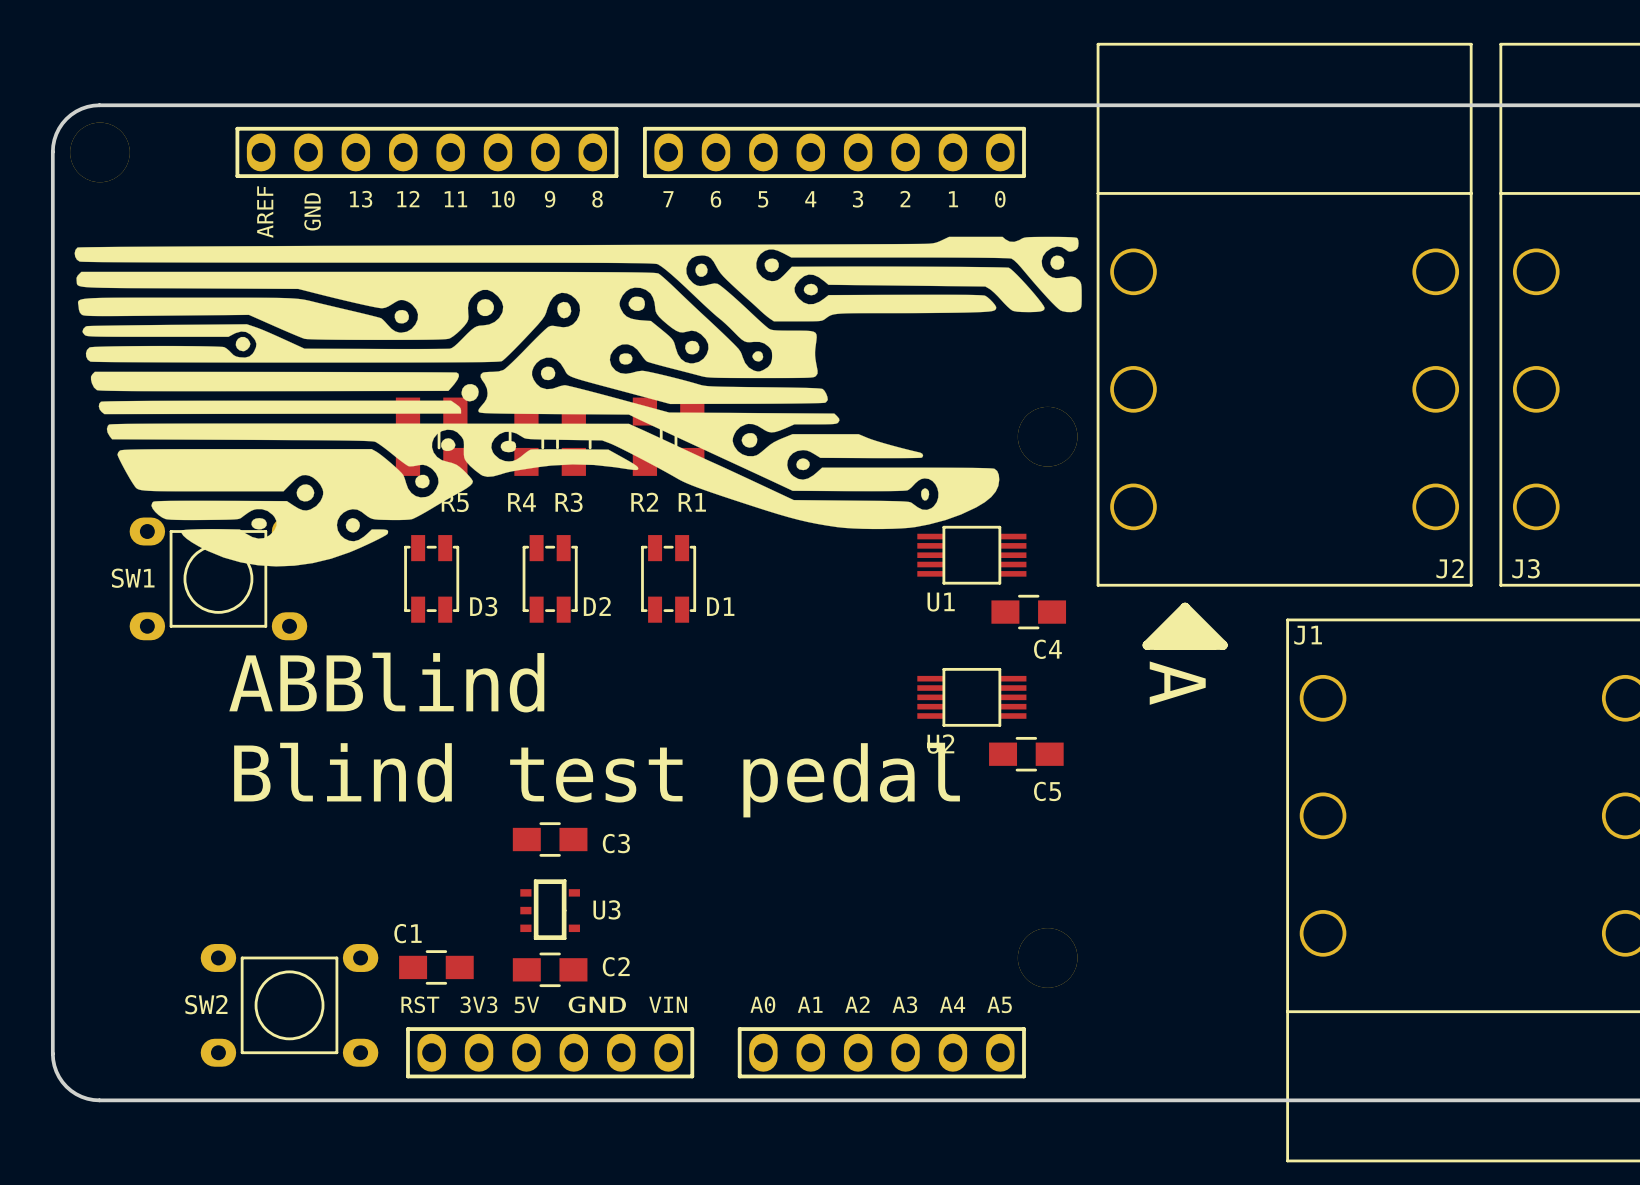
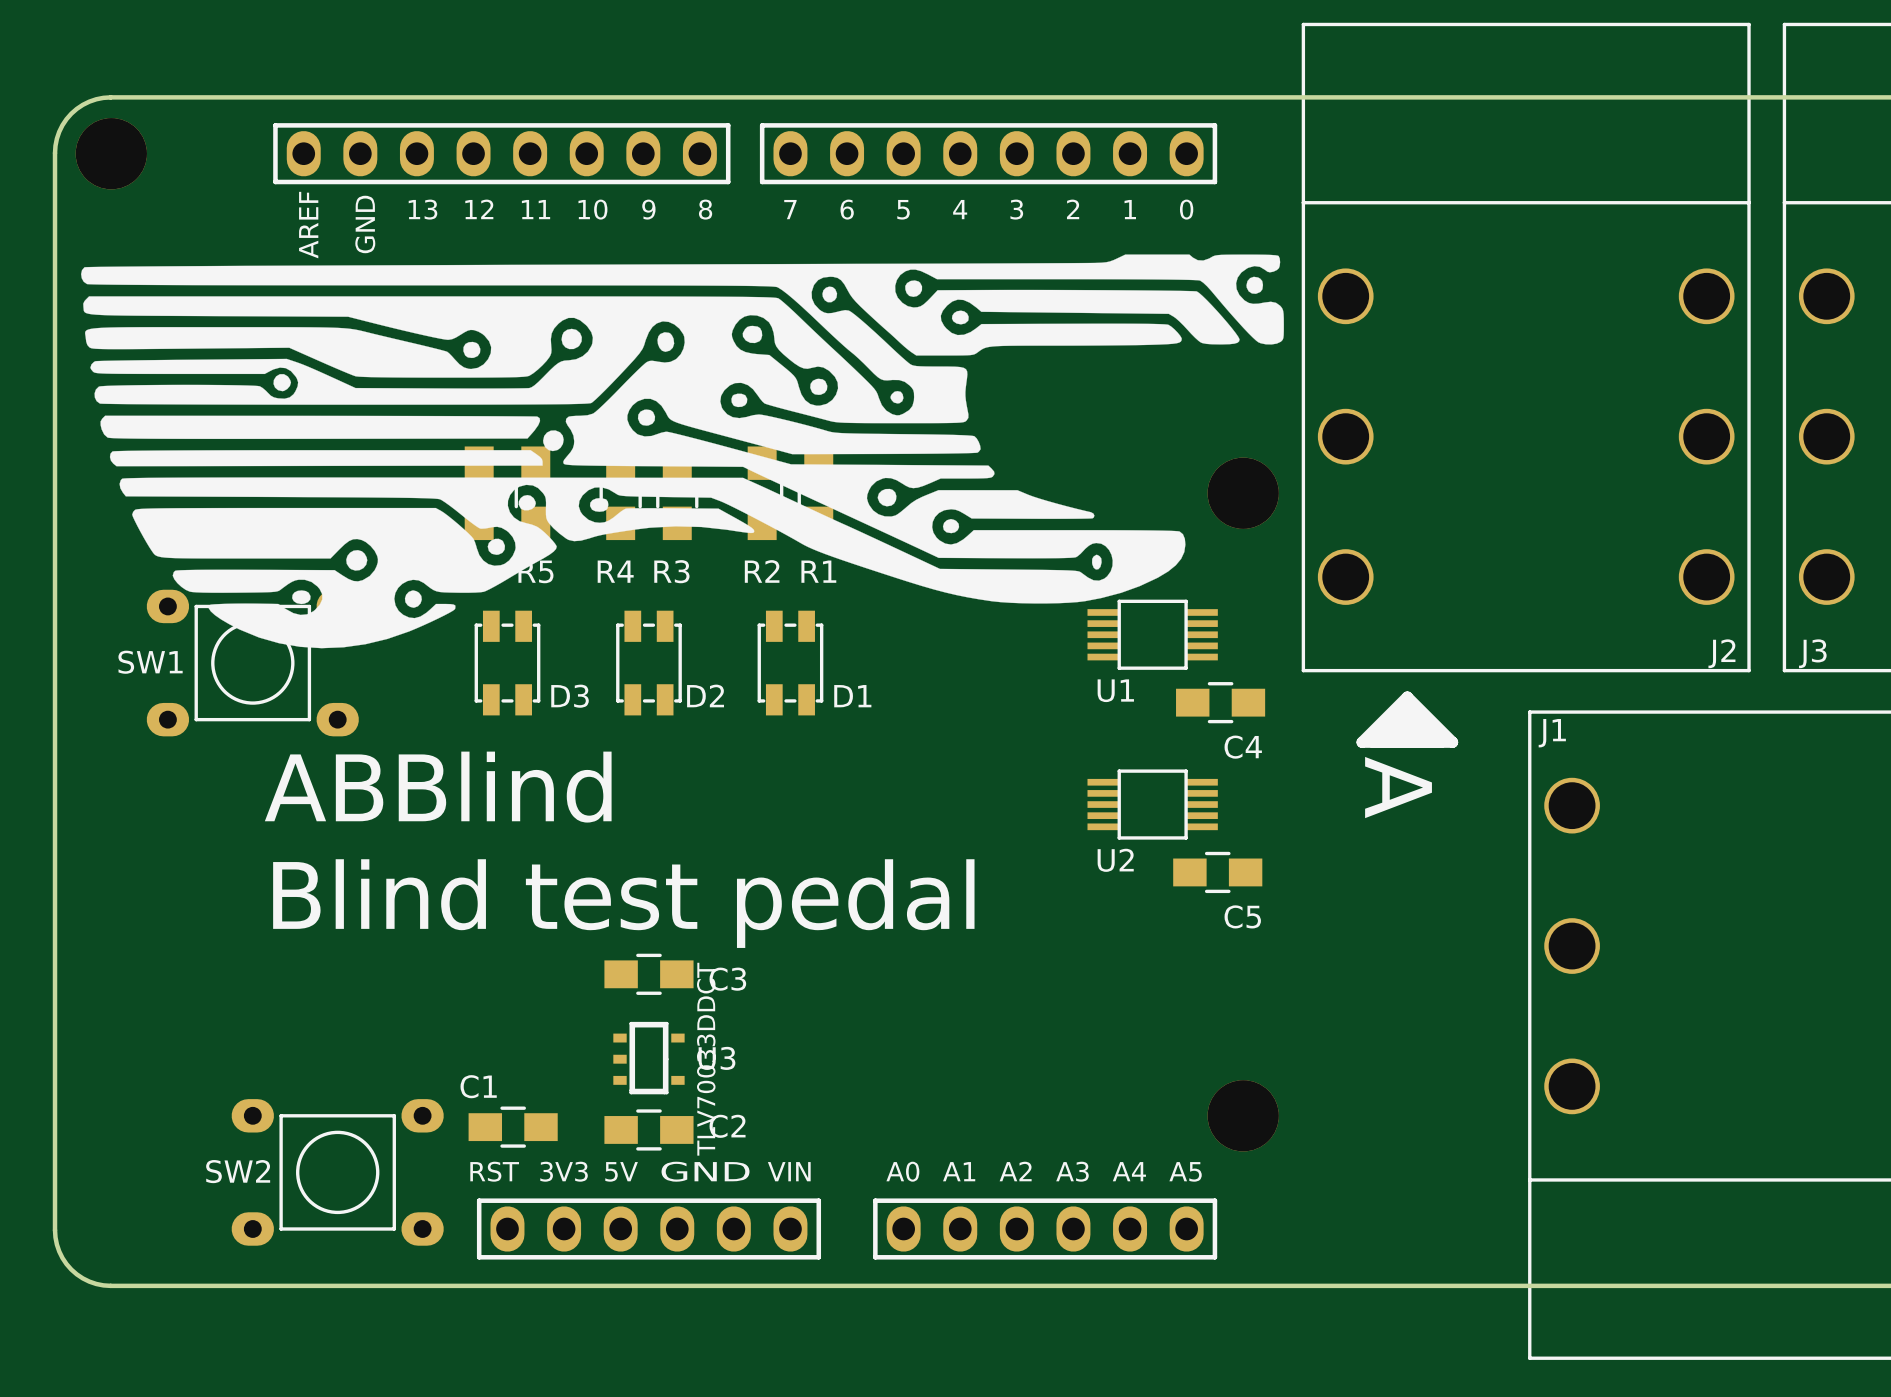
U3 value: none -> TLV70033DDCT (706, 1059)

